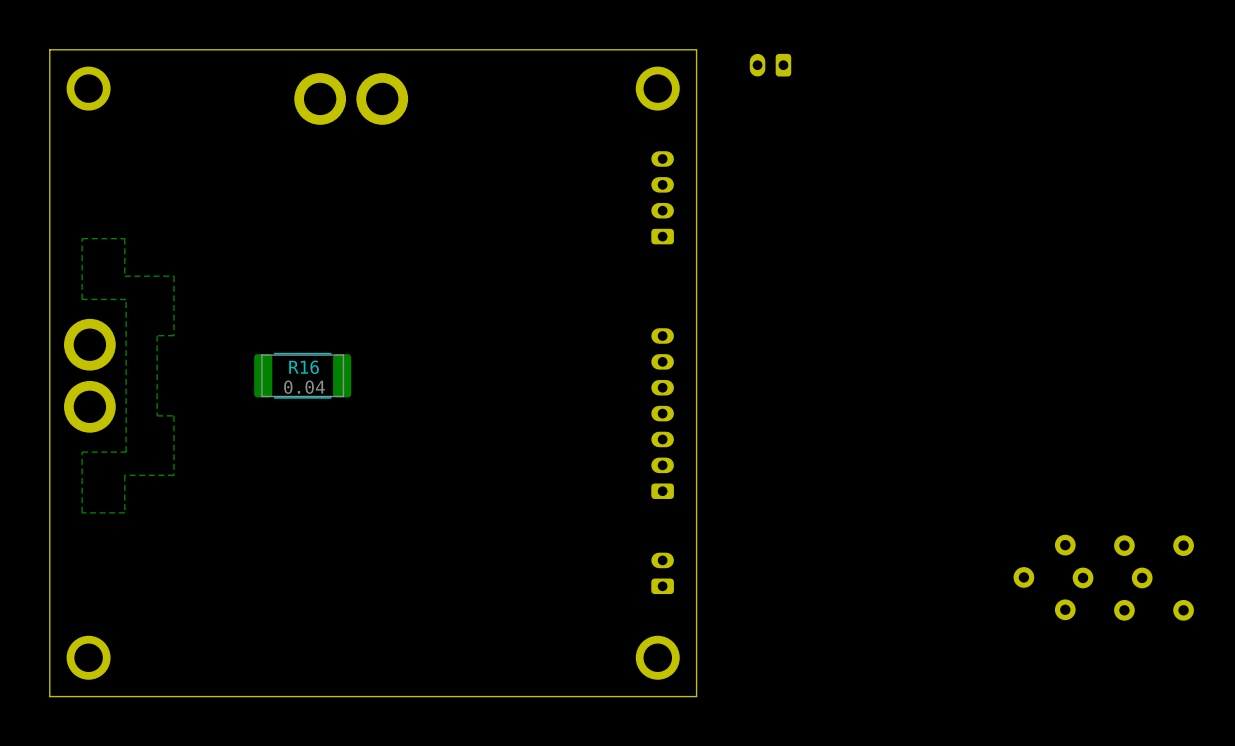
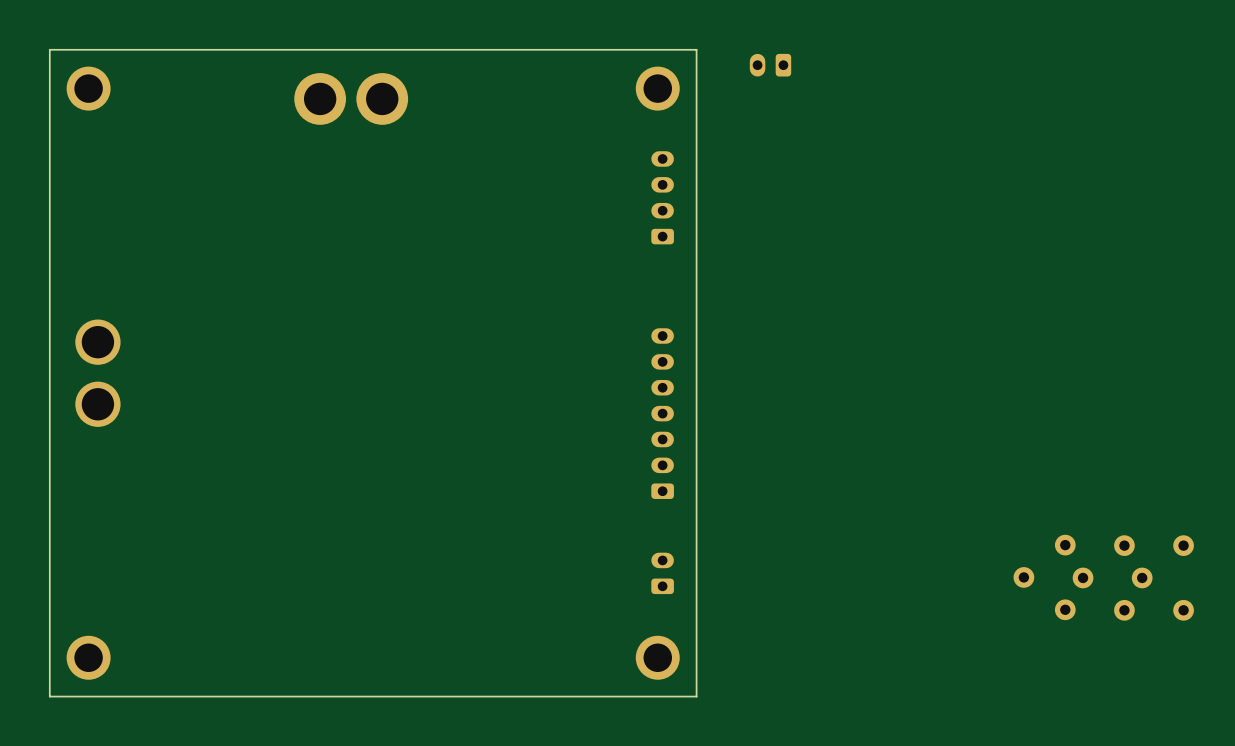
zone outline: (124, 238) (124, 276) (173, 276) (173, 335) (157, 335) (157, 415) (173, 415) (173, 475) (124, 475) (124, 512) (82, 512) (82, 452) (126, 452) (126, 299) (82, 299) (82, 238) (124, 238) -> none
part footprint: [64, 318, 116, 433] -> [75, 319, 121, 427]
R16: 0.04 (302, 375) -> none

